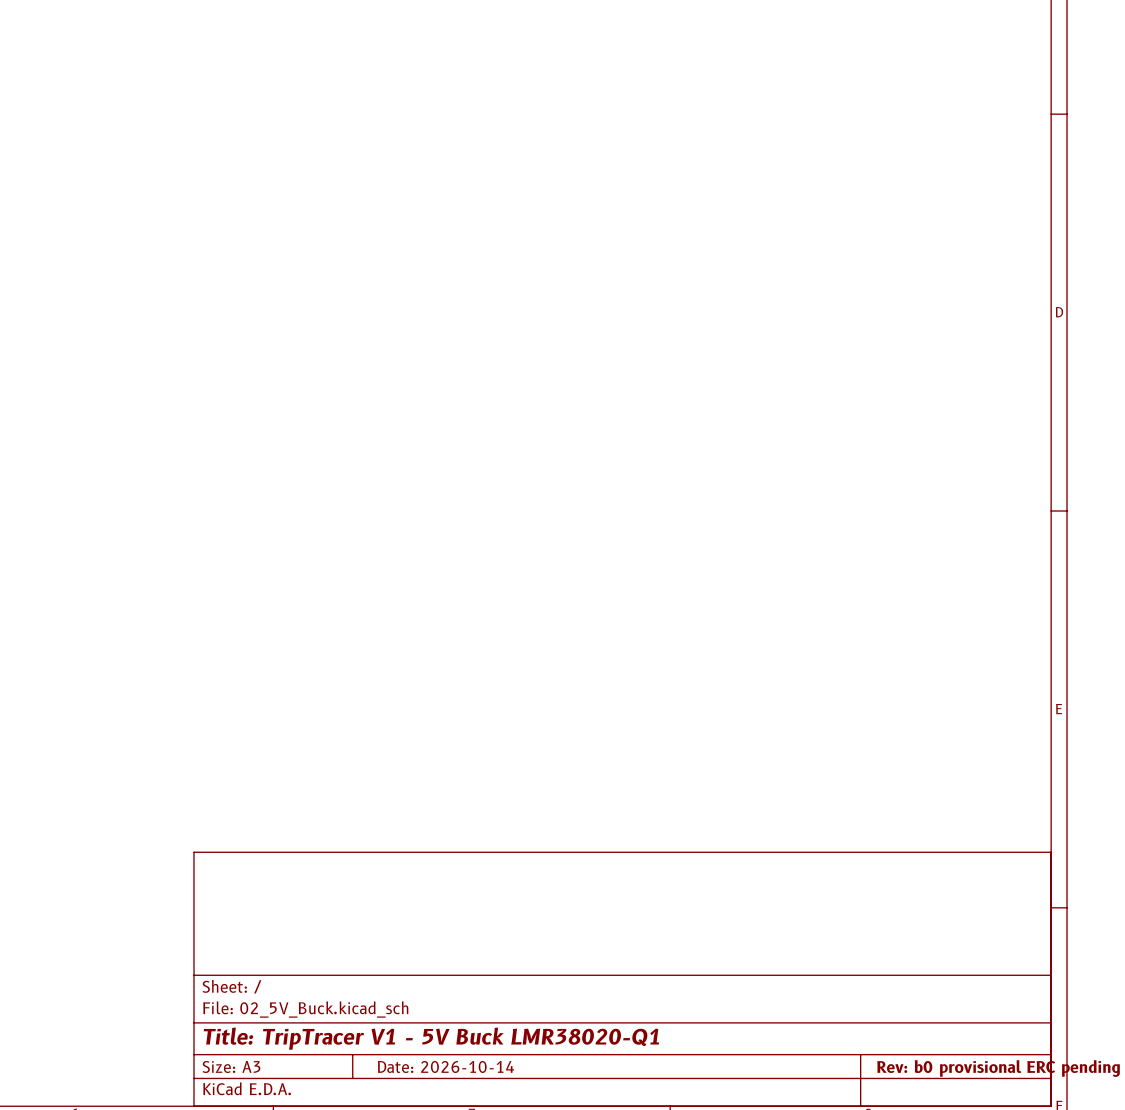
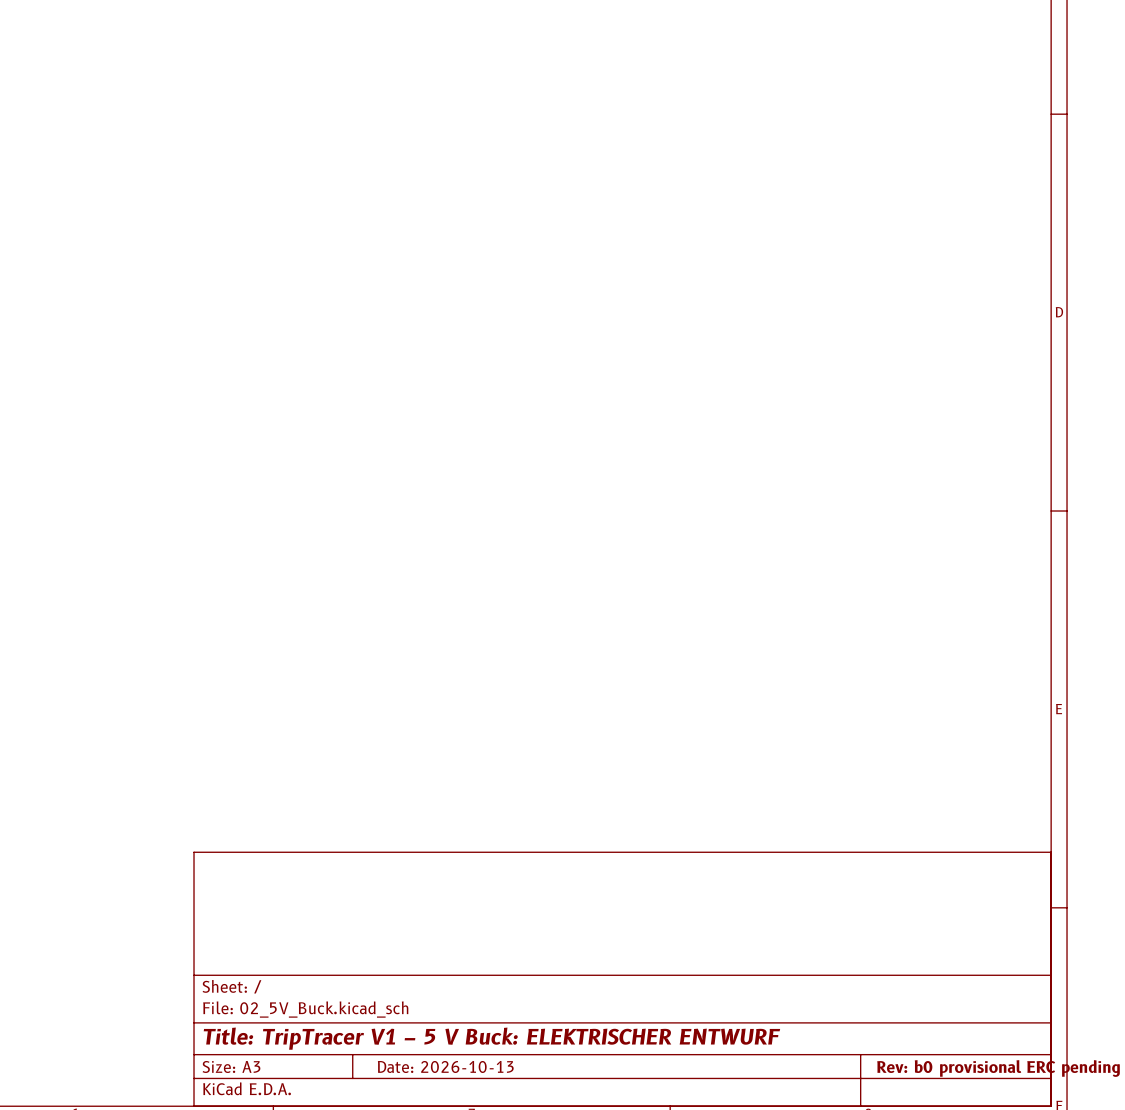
title block: Title: TripTracer V1 - 5V Buck LMR38020-Q1 (431, 1038) -> Title: TripTracer V1 – 5 V Buck: ELEKTRISCHER ENTWURF (491, 1038)
title block: Date: 2026-10-14 (445, 1066) -> Date: 2026-10-13 (445, 1066)

